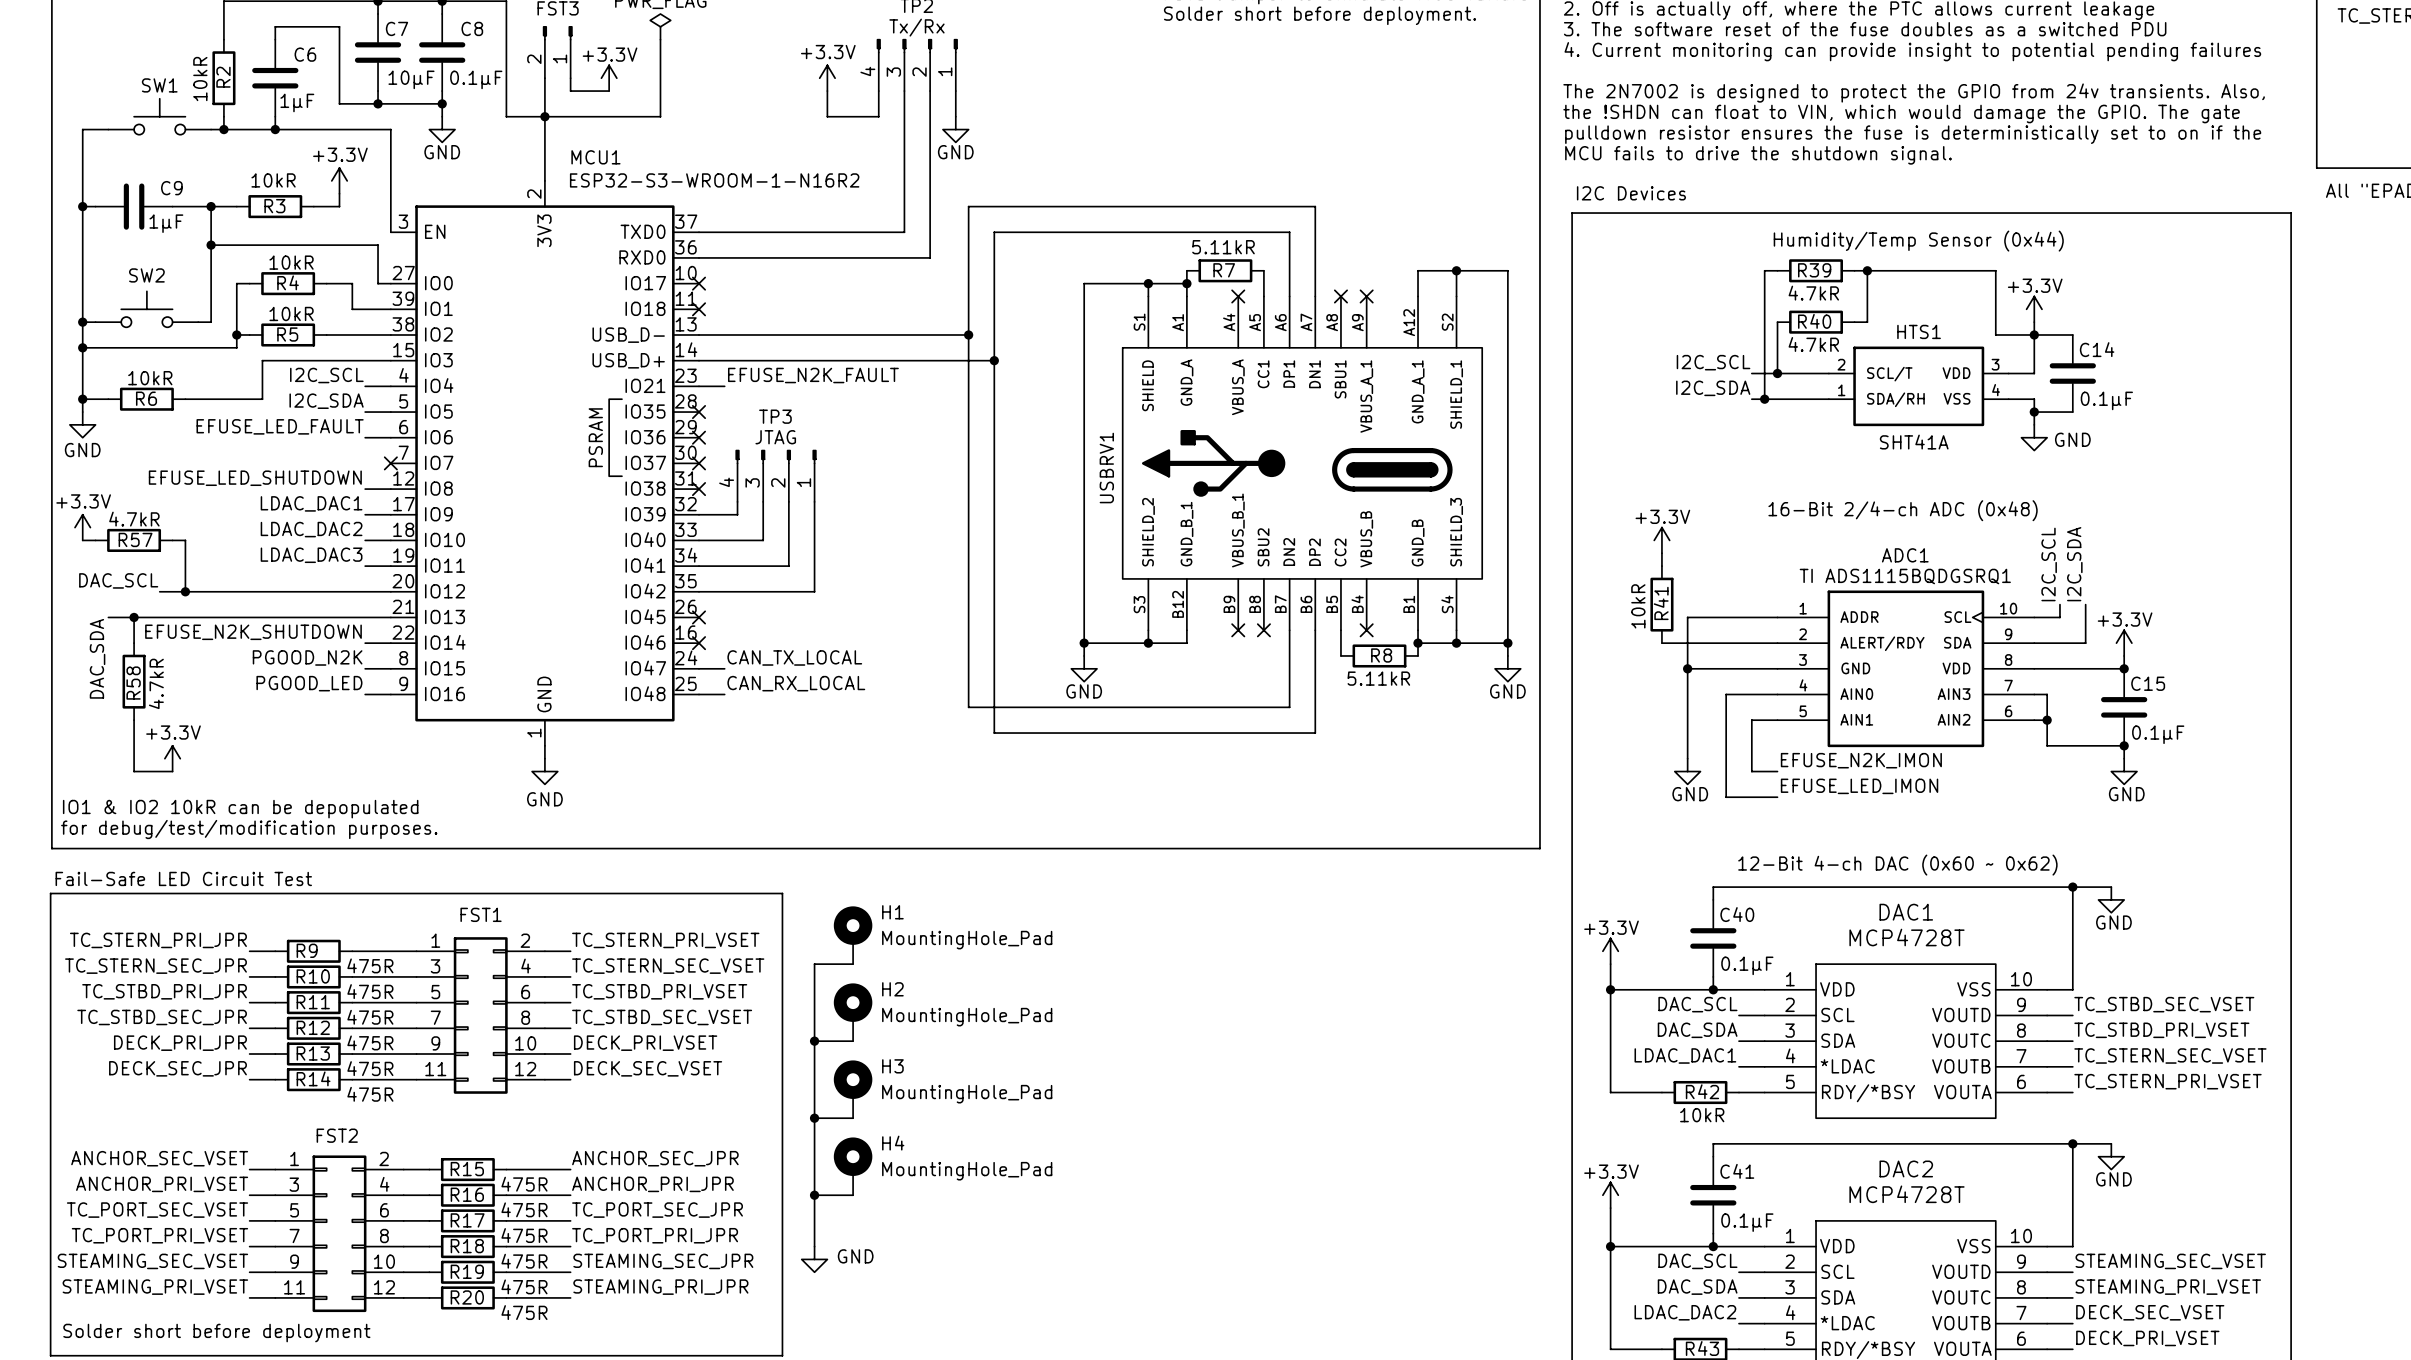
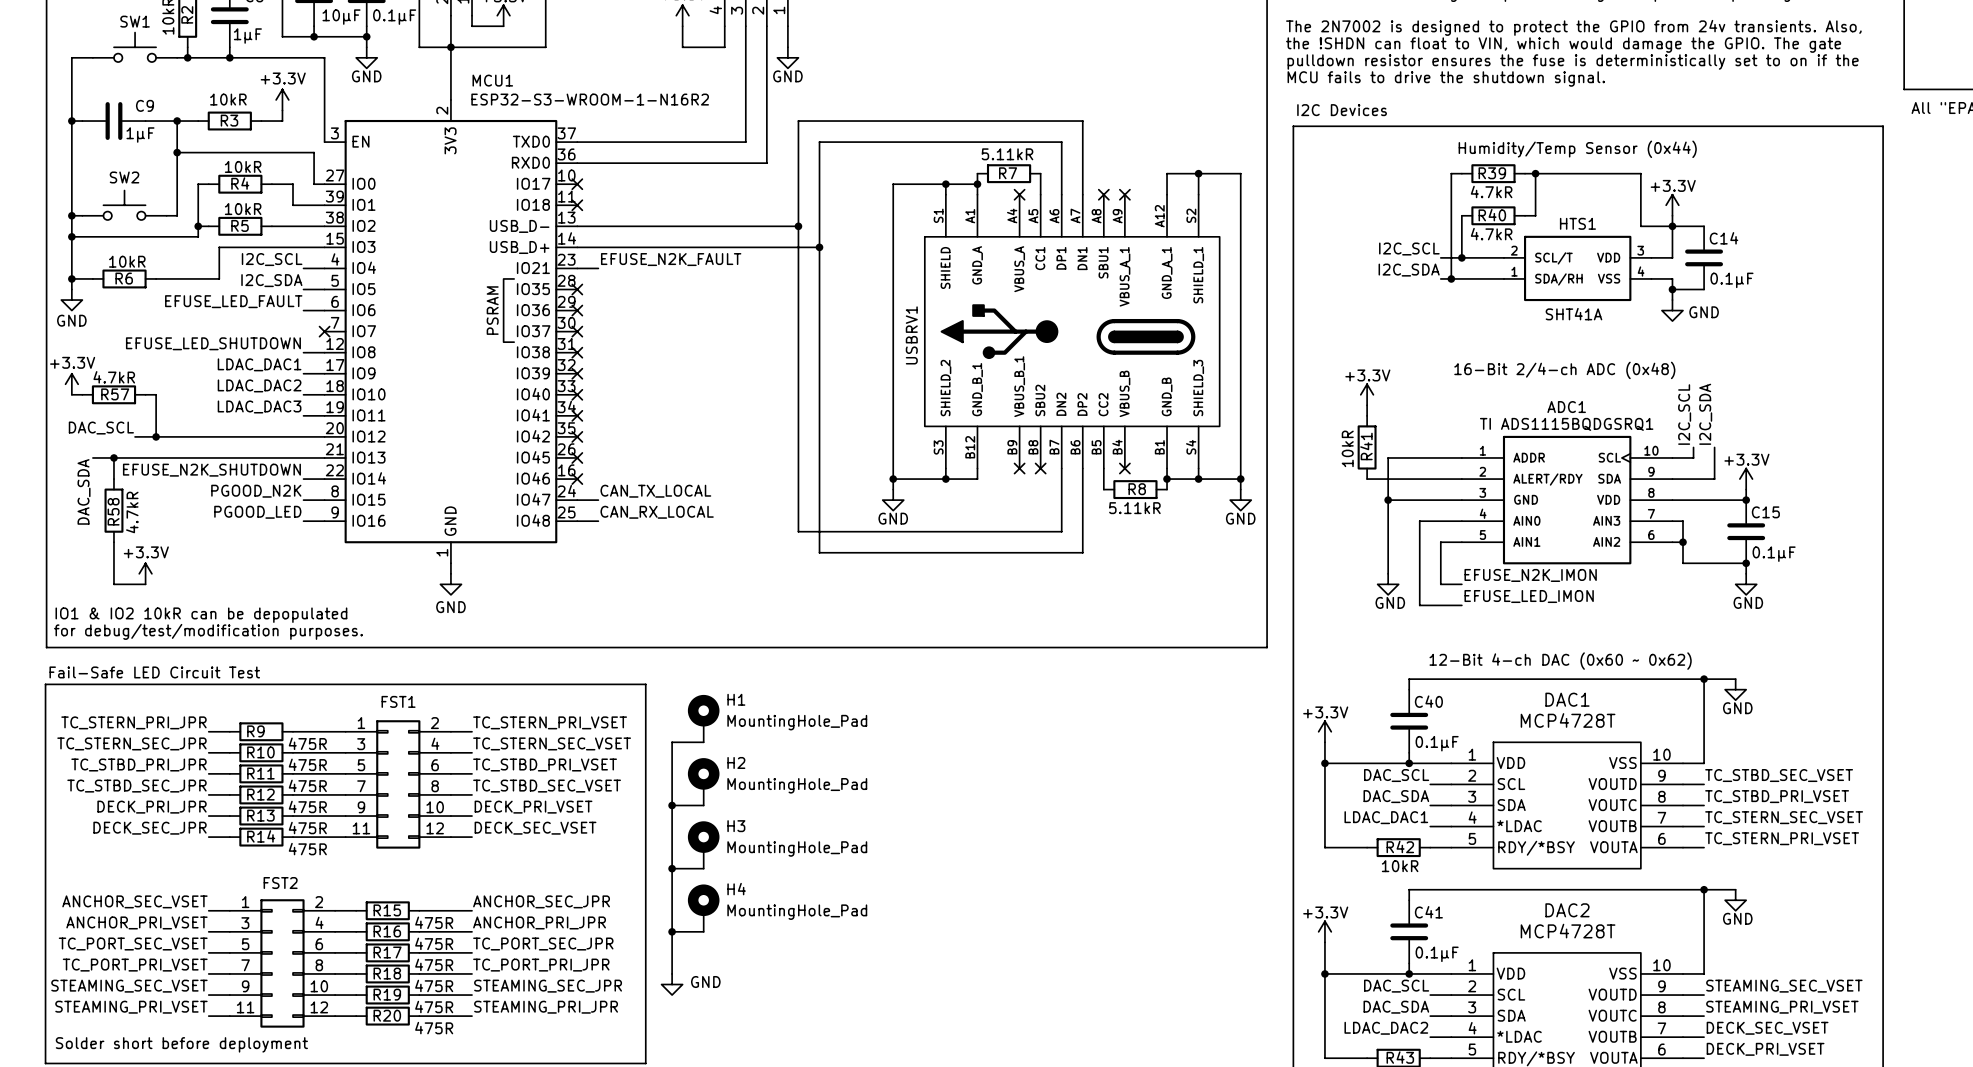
TP3: JTAG (776, 475) -> none
wire: (737, 501) (737, 514) (699, 514) -> none
wire: (763, 501) (763, 540) (699, 540) -> none
wire: (788, 501) (788, 566) (699, 566) -> none
wire: (814, 501) (814, 591) (699, 591) -> none
no-connect mark: none -> (577, 373)
no-connect mark: none -> (577, 394)
no-connect mark: none -> (577, 415)
no-connect mark: none -> (577, 436)

